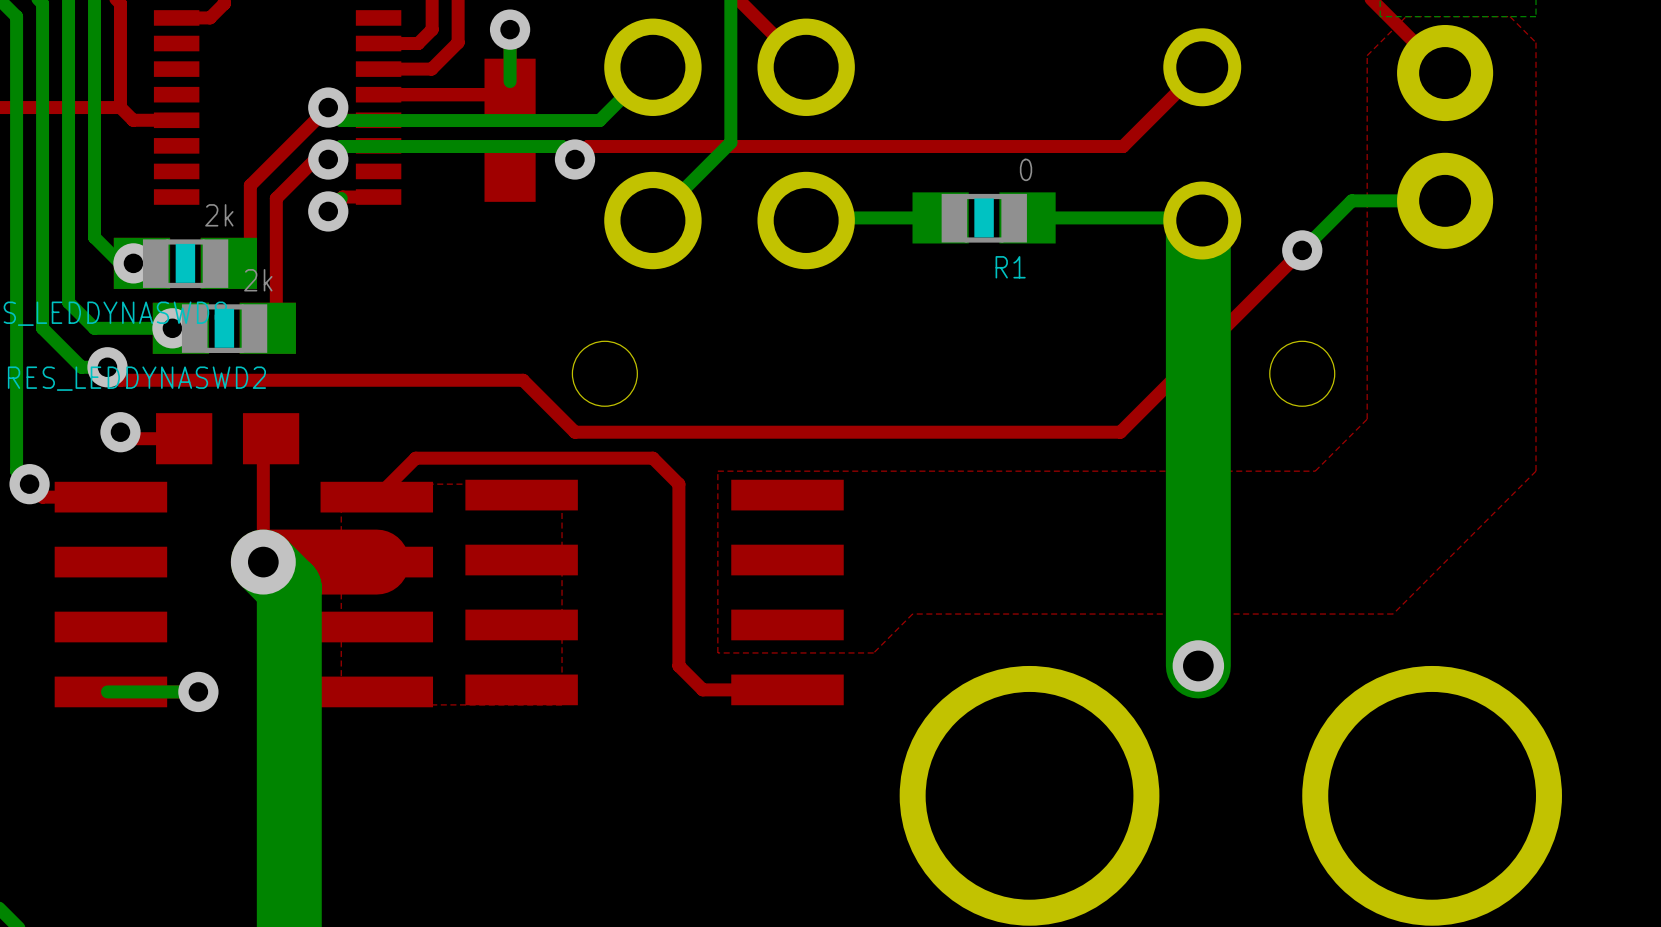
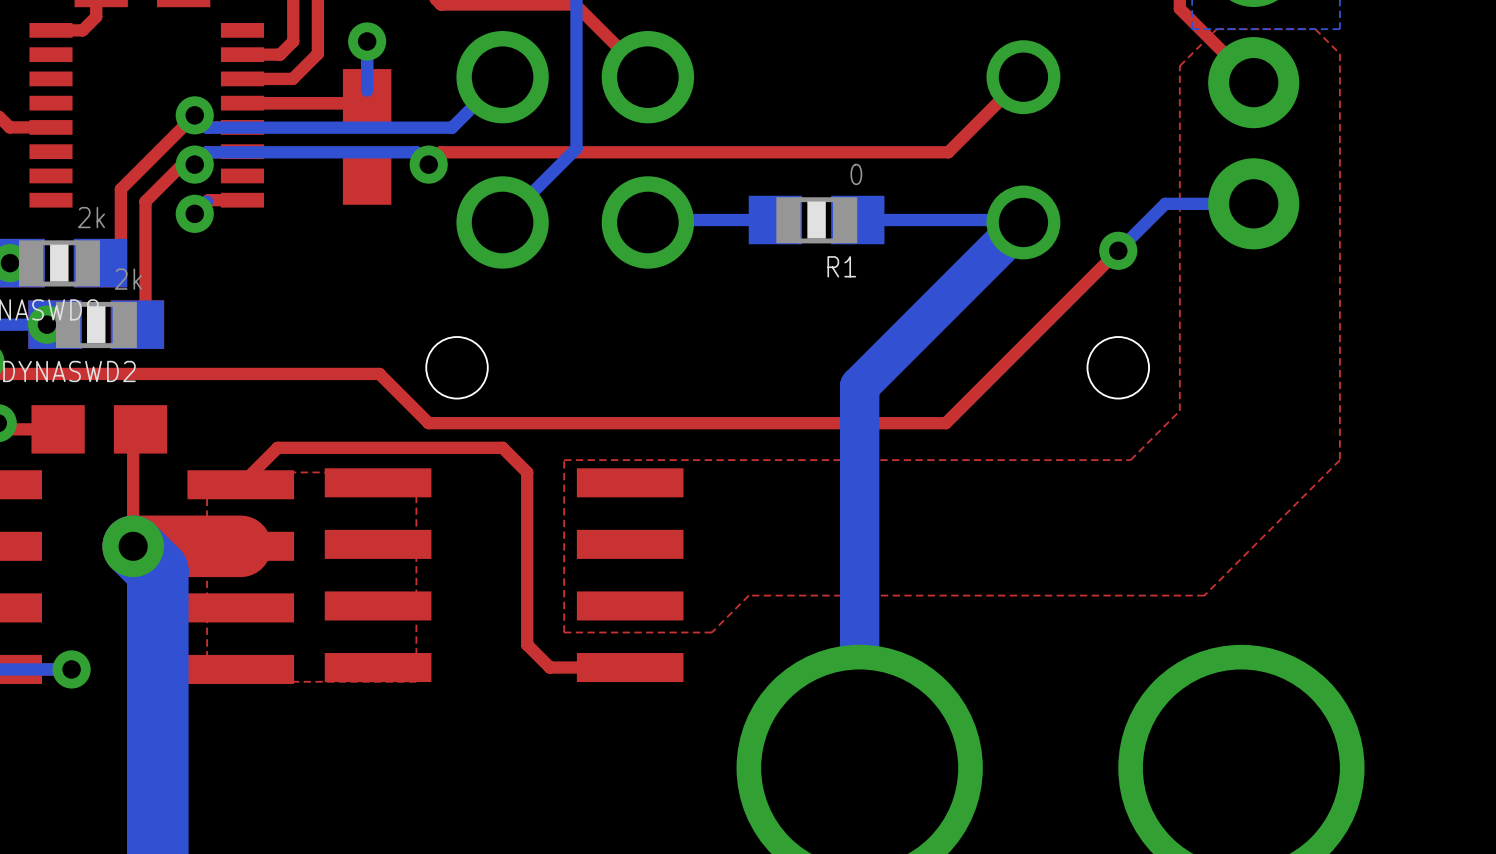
bottom track: (1198, 224) (1198, 665) -> (1019, 226) (859, 386) (859, 767)
via: (1198, 665) -> none

